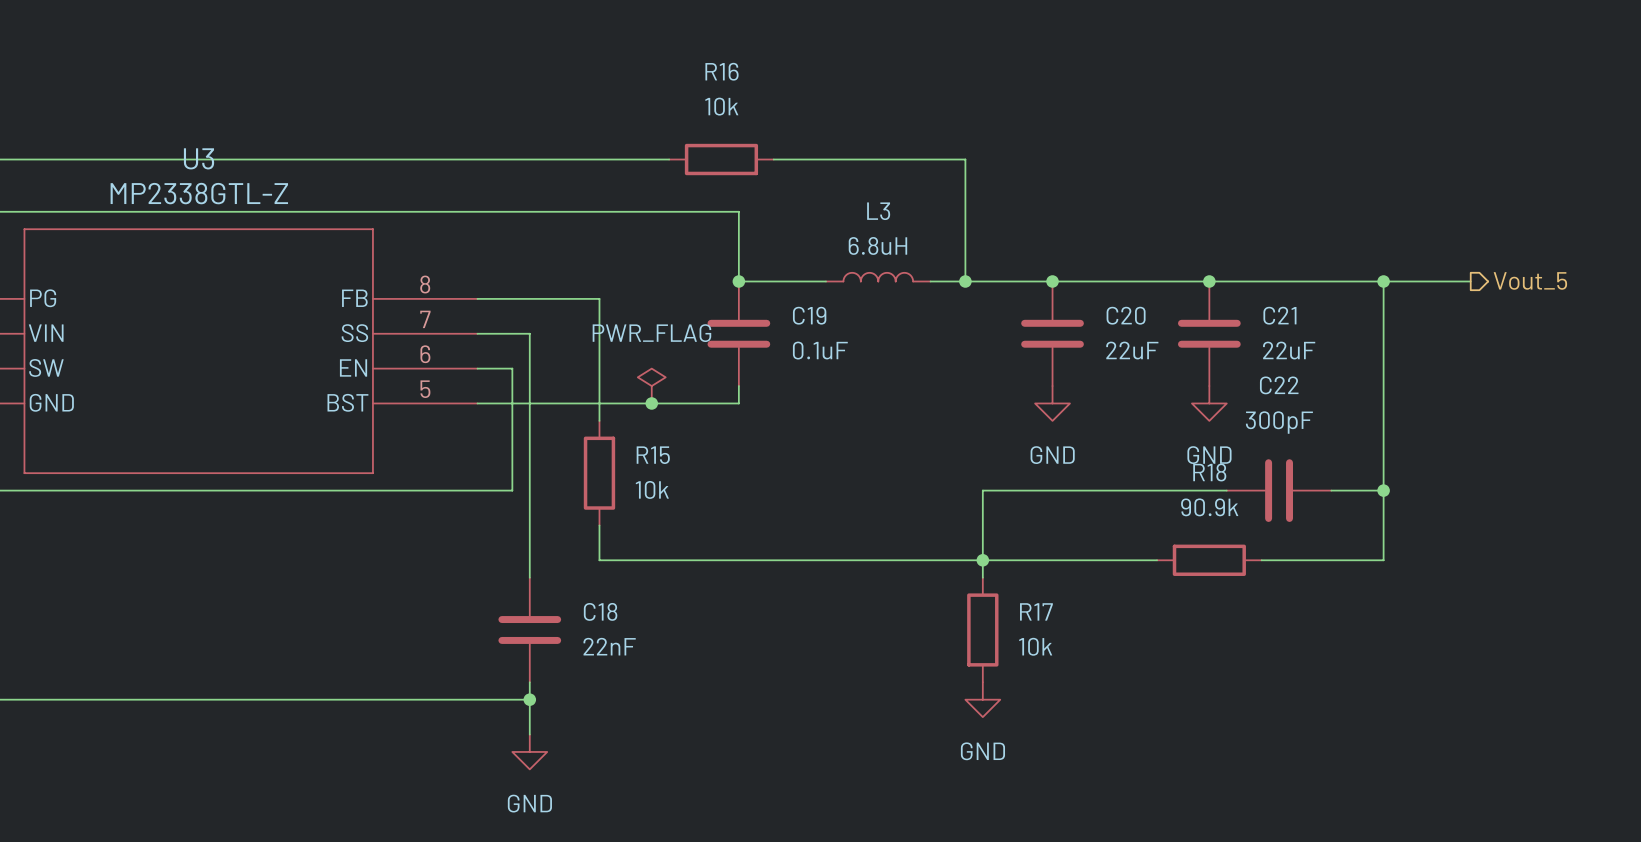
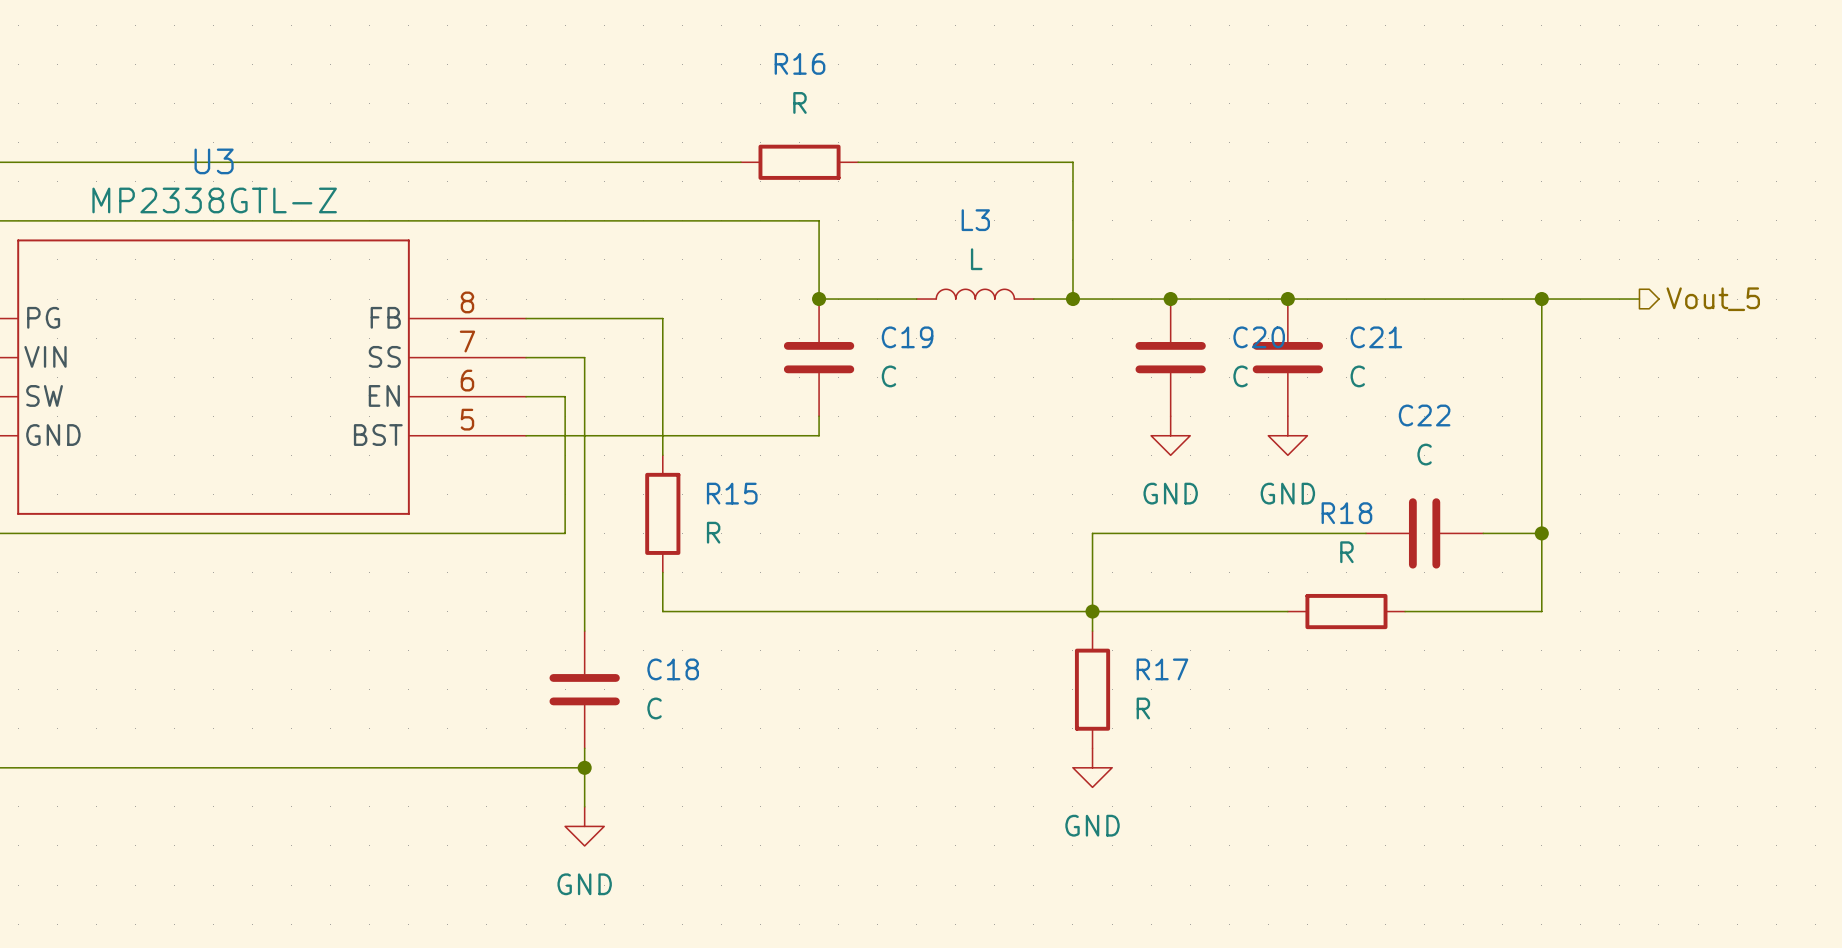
R16 value: 10k (721, 106) -> R (799, 102)
L3 value: 6.8uH (877, 245) -> L (976, 259)
junction position: (1209, 281) -> (1287, 299)
C21 position: (1209, 333) -> (1287, 357)
C19 value: 0.1uF (820, 350) -> C (888, 376)
C20 value: 22uF (1132, 350) -> C (1240, 376)
C21 value: 22uF (1289, 350) -> C (1357, 376)
power symbol: PWR_FLAG (651, 386) -> none
junction: (651, 403) -> none
power symbol position: GND (1209, 403) -> GND (1287, 435)
C22 value: 300pF (1279, 422) -> C (1424, 454)
R15 value: 10k (652, 489) -> R (713, 532)
R18 value: 90.9k (1209, 507) -> R (1346, 552)
C18 value: 22nF (609, 646) -> C (654, 708)
R17 value: 10k (1035, 646) -> R (1143, 708)

